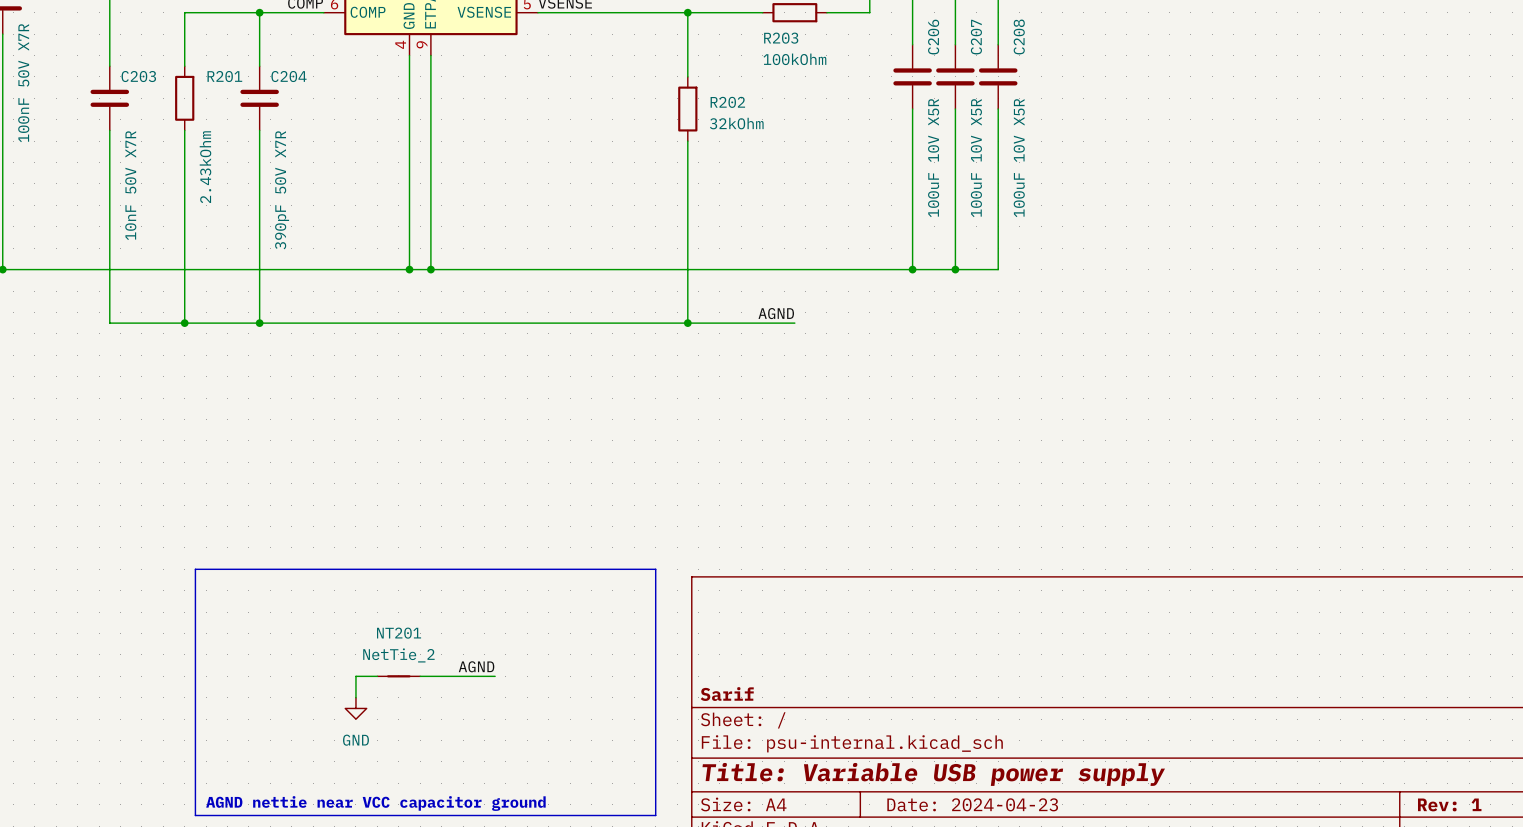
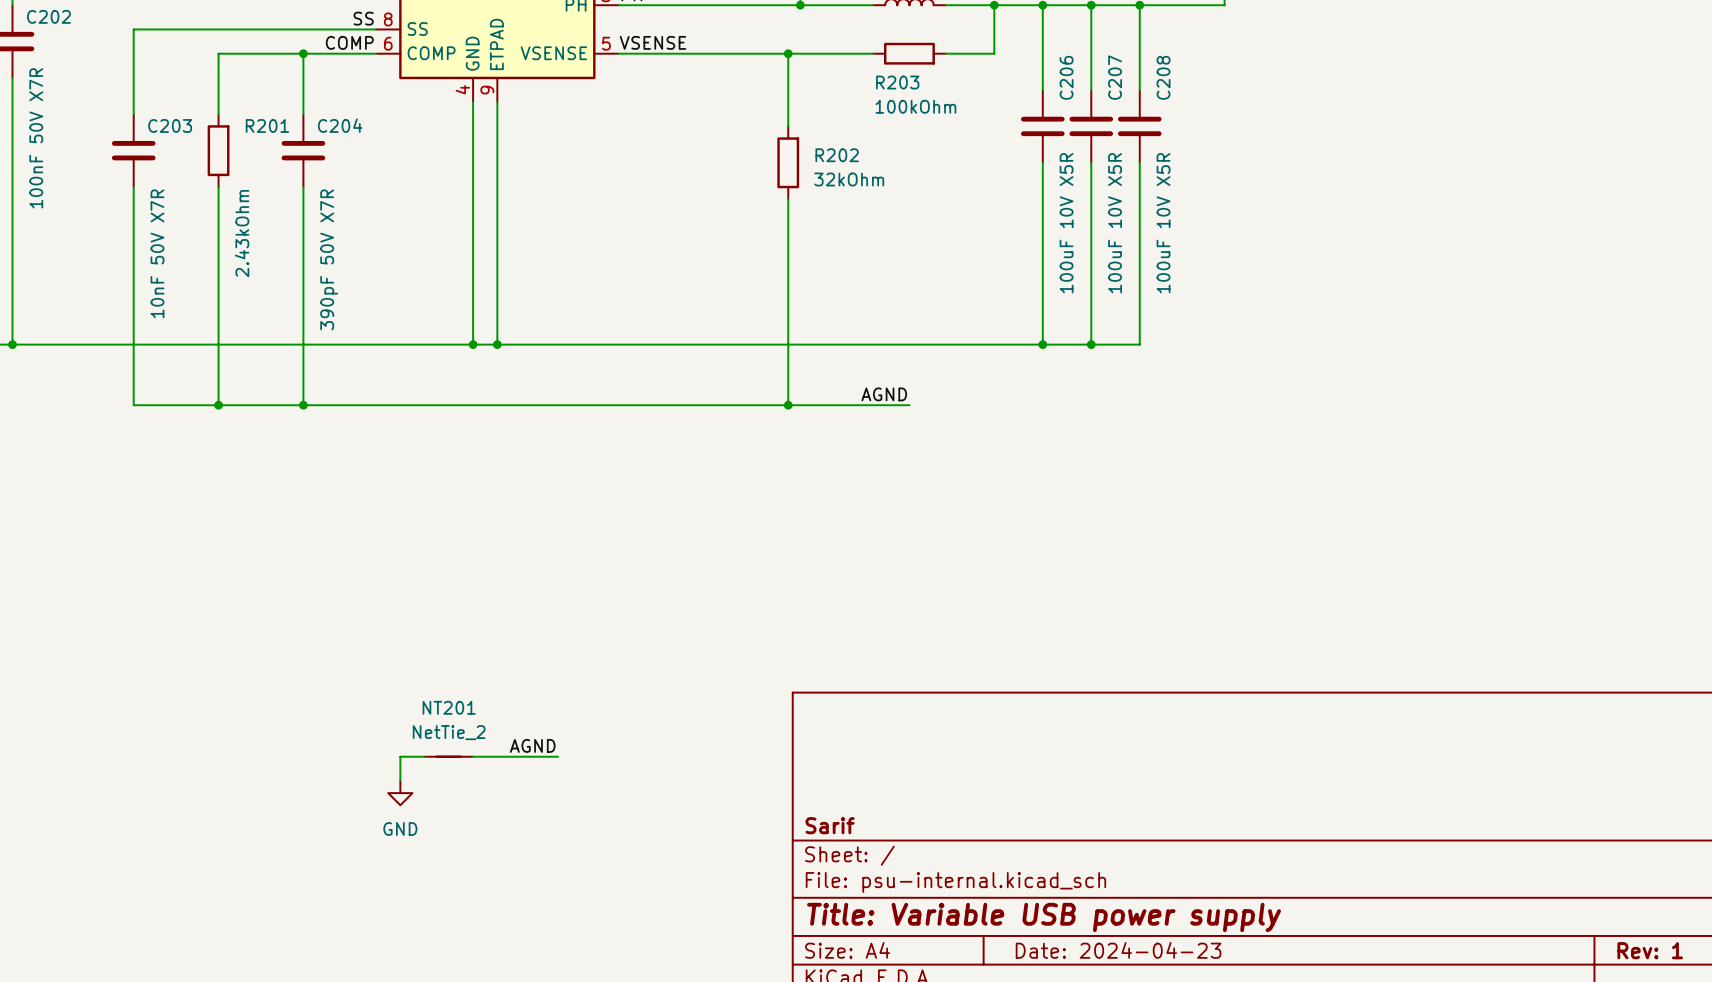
line: (195, 569) (655, 569) (655, 815) (195, 815) (195, 569) -> none
label position: AGND (476, 666) -> AGND (532, 745)
wire: (377, 676) (355, 676) (355, 697) -> (424, 756) (400, 756) (400, 780)
NT201 position: (398, 676) -> (448, 756)
wire: (420, 676) (495, 676) -> (473, 756) (557, 756)
power symbol position: GND (355, 708) -> GND (400, 793)
text: AGND nettie near VCC capacitor ground (375, 803) -> none

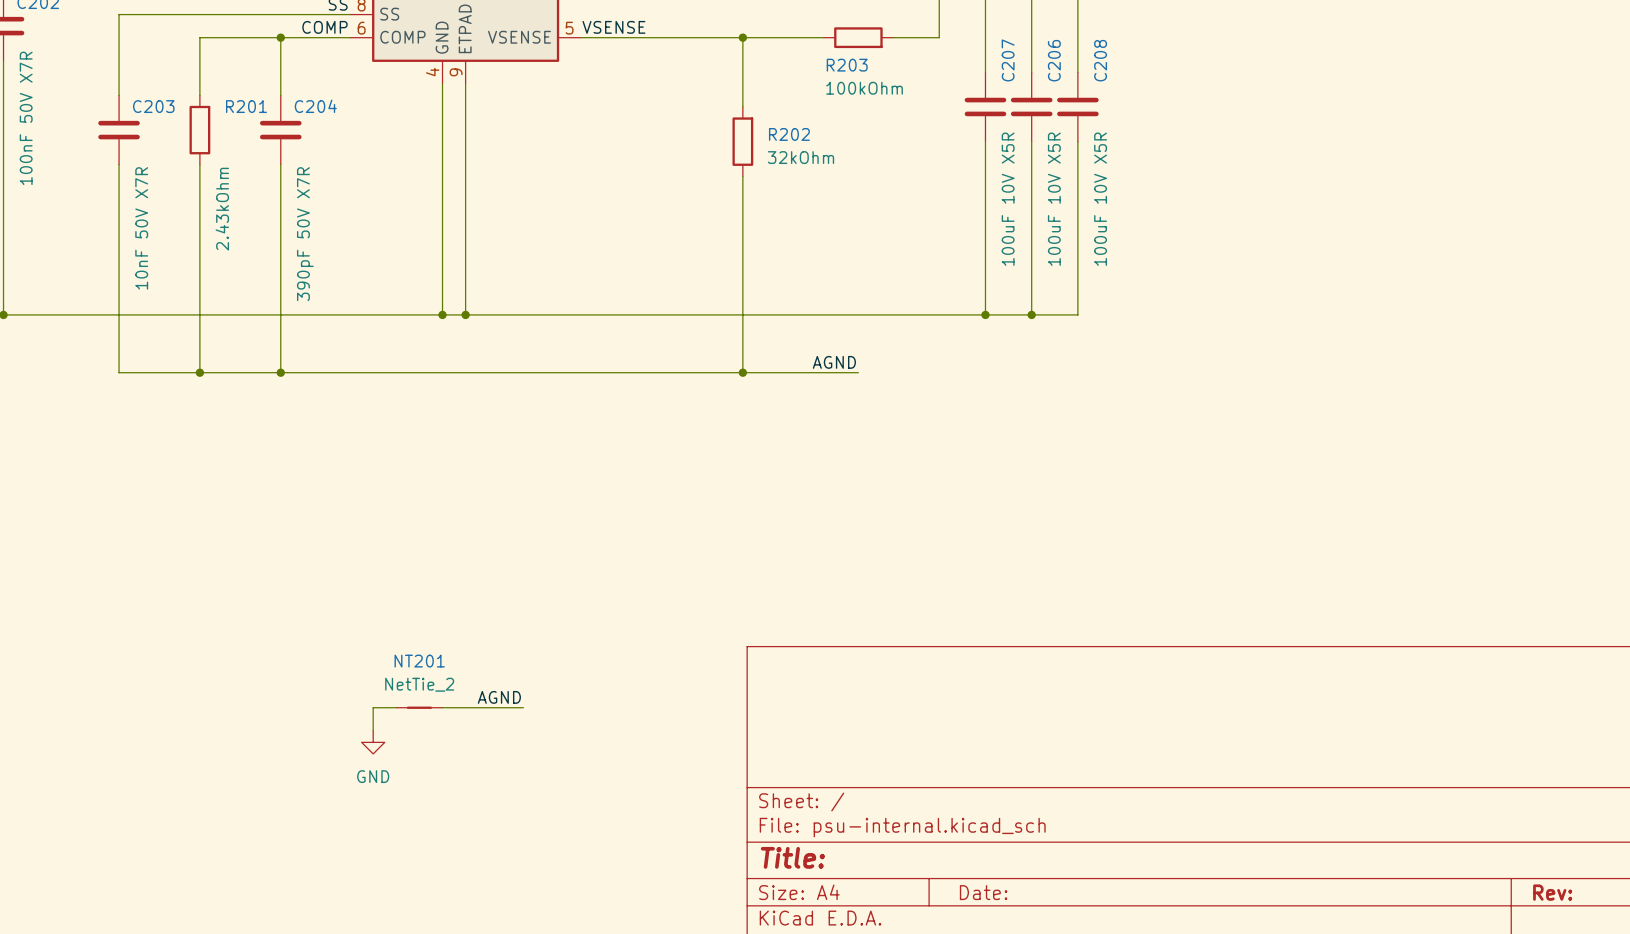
C206 name: C206 (1066, 77) -> C207 (1008, 60)
C207 name: C207 (1115, 77) -> C206 (1054, 60)
title block: Sarif (830, 825) -> none
title block: Title: Variable USB power supply (1044, 917) -> Title: (792, 857)
title block: Date: 2024-04-23 (1118, 950) -> Date: (983, 892)
title block: Rev: 1 (1650, 950) -> Rev: (1552, 892)

